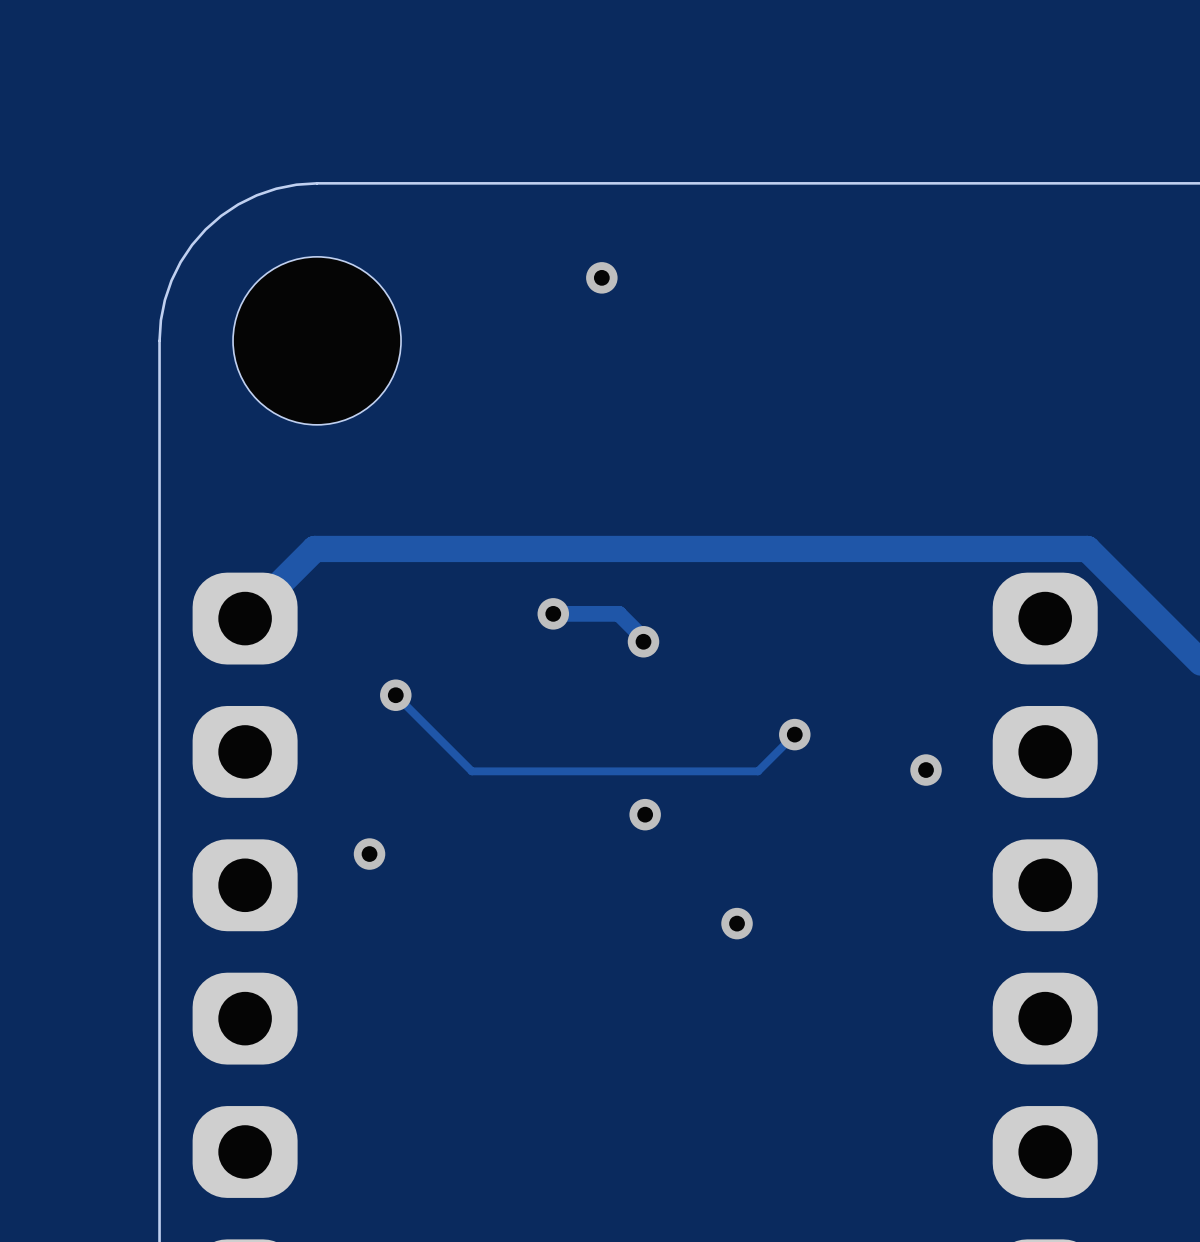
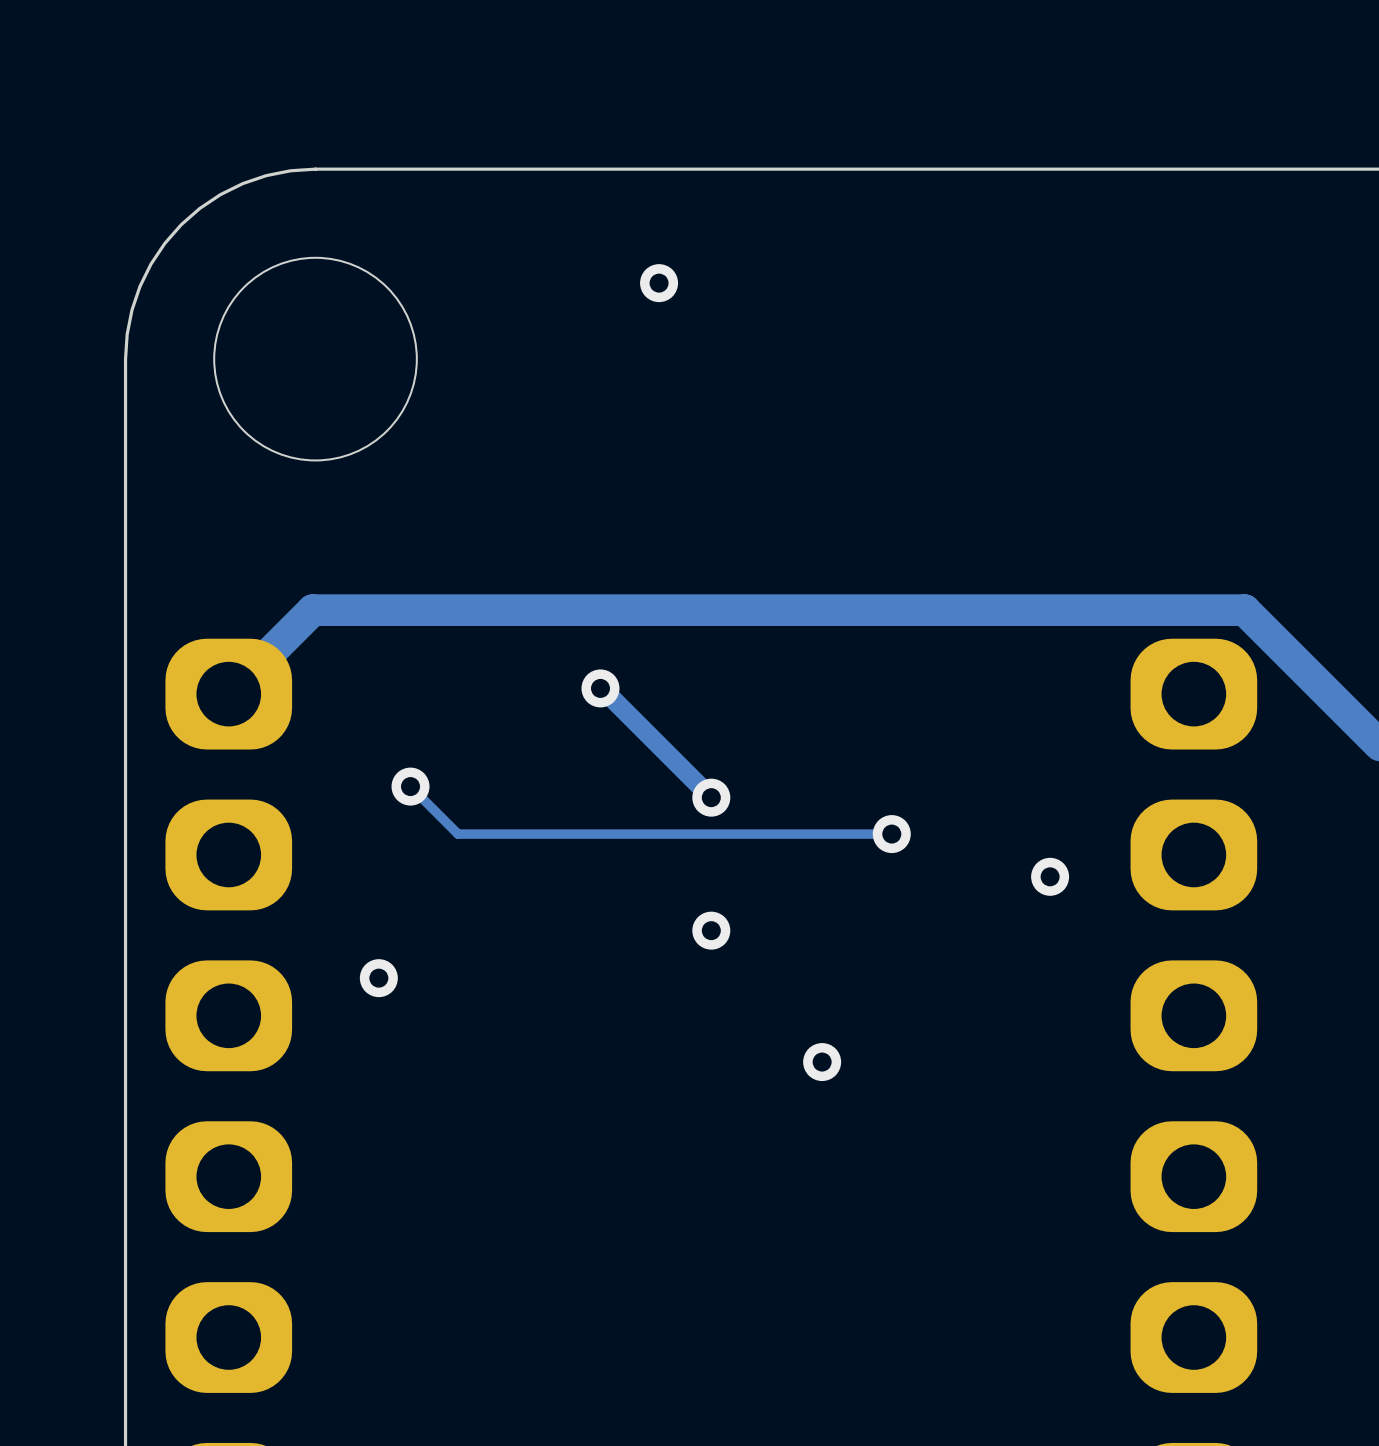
track: (554, 613) (618, 613) (643, 638) (643, 641) -> (602, 688) (711, 797)
via position: (643, 641) -> (711, 797)
track: (794, 734) (758, 771) (471, 771) (435, 734) -> (891, 834) (458, 834)

